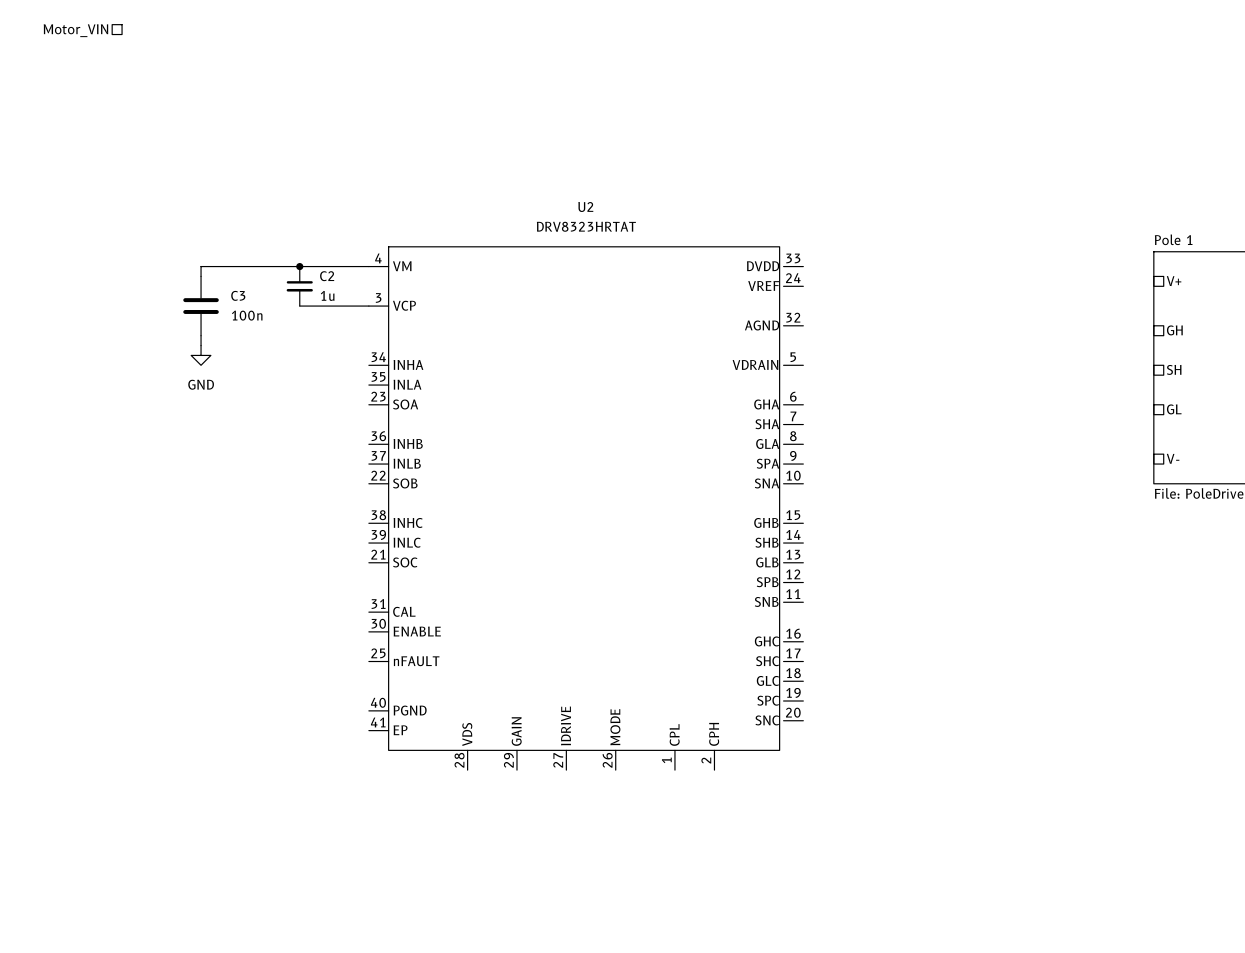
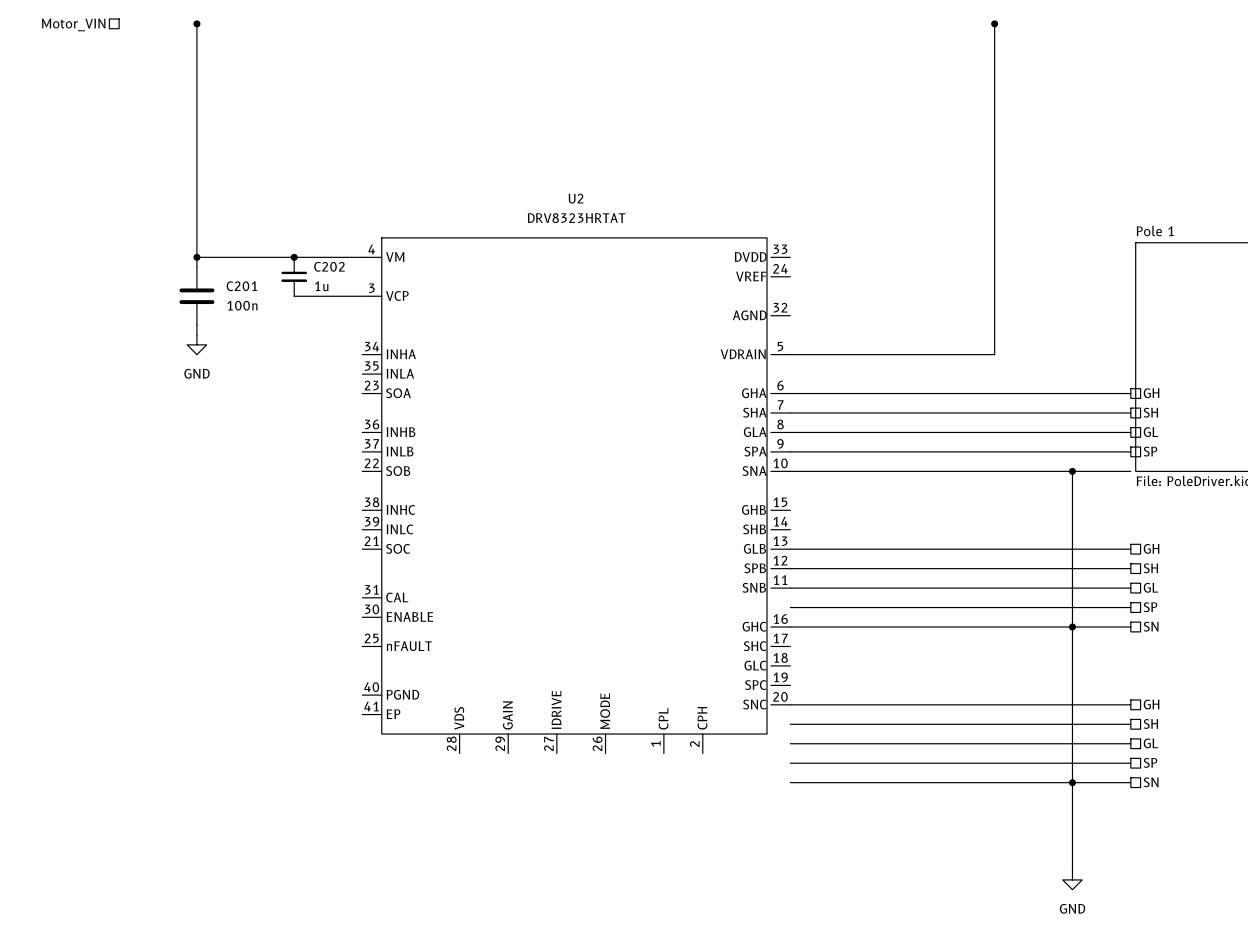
wire: none -> (196, 23) (196, 257)
junction: none -> (196, 23)
wire: none -> (994, 23) (994, 354) (790, 354)
junction: none -> (994, 23)
junction: none -> (196, 257)
C2 name: C2 (327, 276) -> C202 (329, 266)
sheet pin: V+ (1174, 281) -> none
C3 name: C3 (238, 295) -> C201 (241, 286)
sheet pin position: GH (1174, 330) -> GH (1151, 393)
sheet pin position: SH (1174, 369) -> SH (1150, 412)
wire: none -> (790, 393) (1130, 393)
sheet pin position: GL (1174, 409) -> GL (1150, 432)
wire: none -> (790, 412) (1130, 412)
wire: none -> (790, 432) (1130, 432)
sheet pin: V- (1173, 458) -> SP (1150, 451)
wire: none -> (790, 451) (1130, 451)
wire: none -> (790, 471) (1130, 471)
wire: none -> (1072, 471) (1072, 870)
junction: none -> (1072, 471)
wire: none -> (790, 549) (1130, 549)
sheet pin: none -> GH (1151, 548)
wire: none -> (790, 568) (1130, 568)
sheet pin: none -> SH (1150, 568)
sheet pin: none -> GL (1150, 587)
wire: none -> (790, 588) (1130, 588)
sheet pin: none -> SP (1150, 607)
wire: none -> (790, 607) (1130, 607)
wire: none -> (790, 627) (1130, 627)
junction: none -> (1072, 627)
sheet pin: none -> SN (1151, 626)
wire: none -> (790, 704) (1130, 704)
sheet pin: none -> GH (1151, 704)
wire: none -> (790, 724) (1130, 724)
sheet pin: none -> SH (1150, 723)
sheet pin: none -> GL (1150, 743)
wire: none -> (790, 743) (1130, 743)
wire: none -> (790, 763) (1130, 763)
sheet pin: none -> SP (1150, 762)
wire: none -> (790, 782) (1130, 782)
junction: none -> (1072, 782)
sheet pin: none -> SN (1151, 782)
power symbol: none -> GND (1072, 879)

